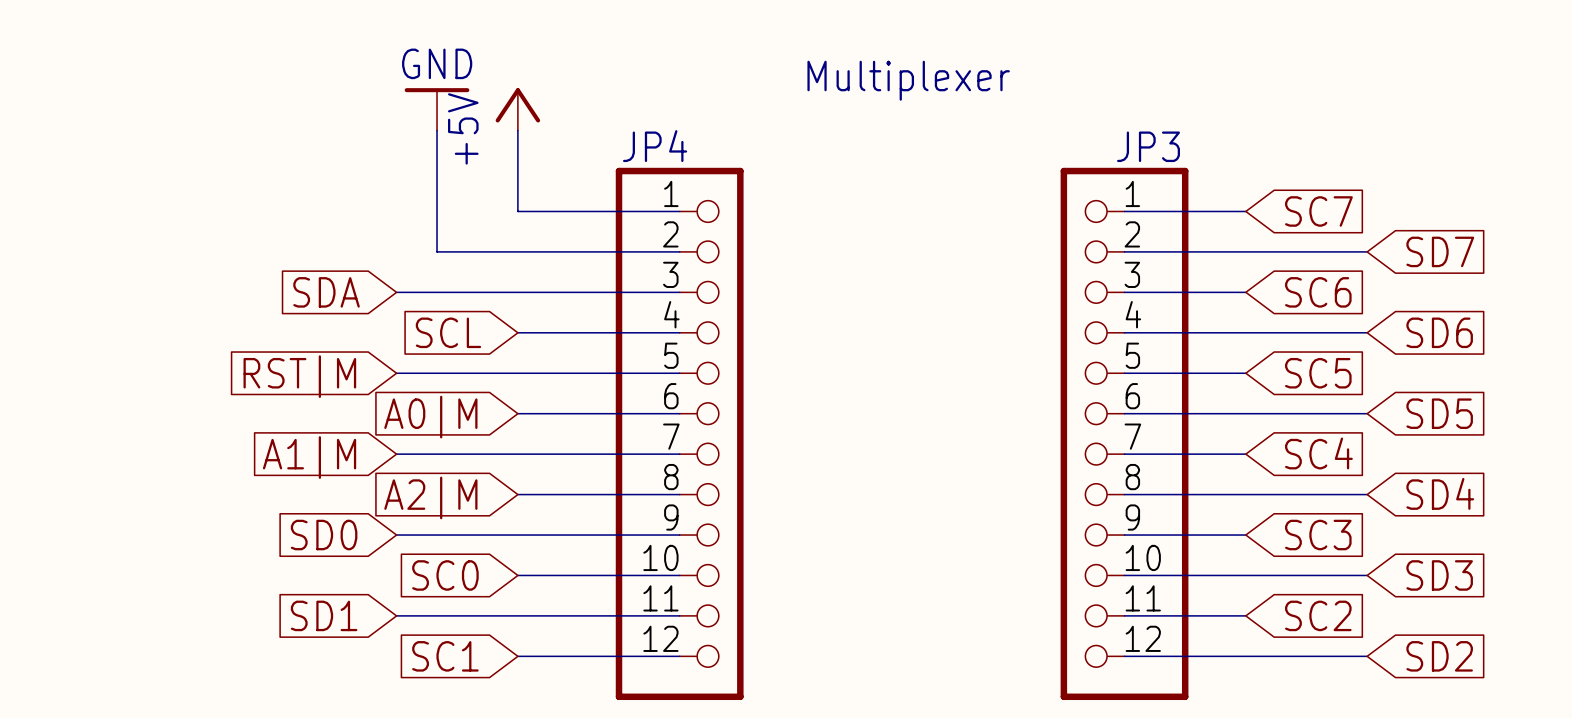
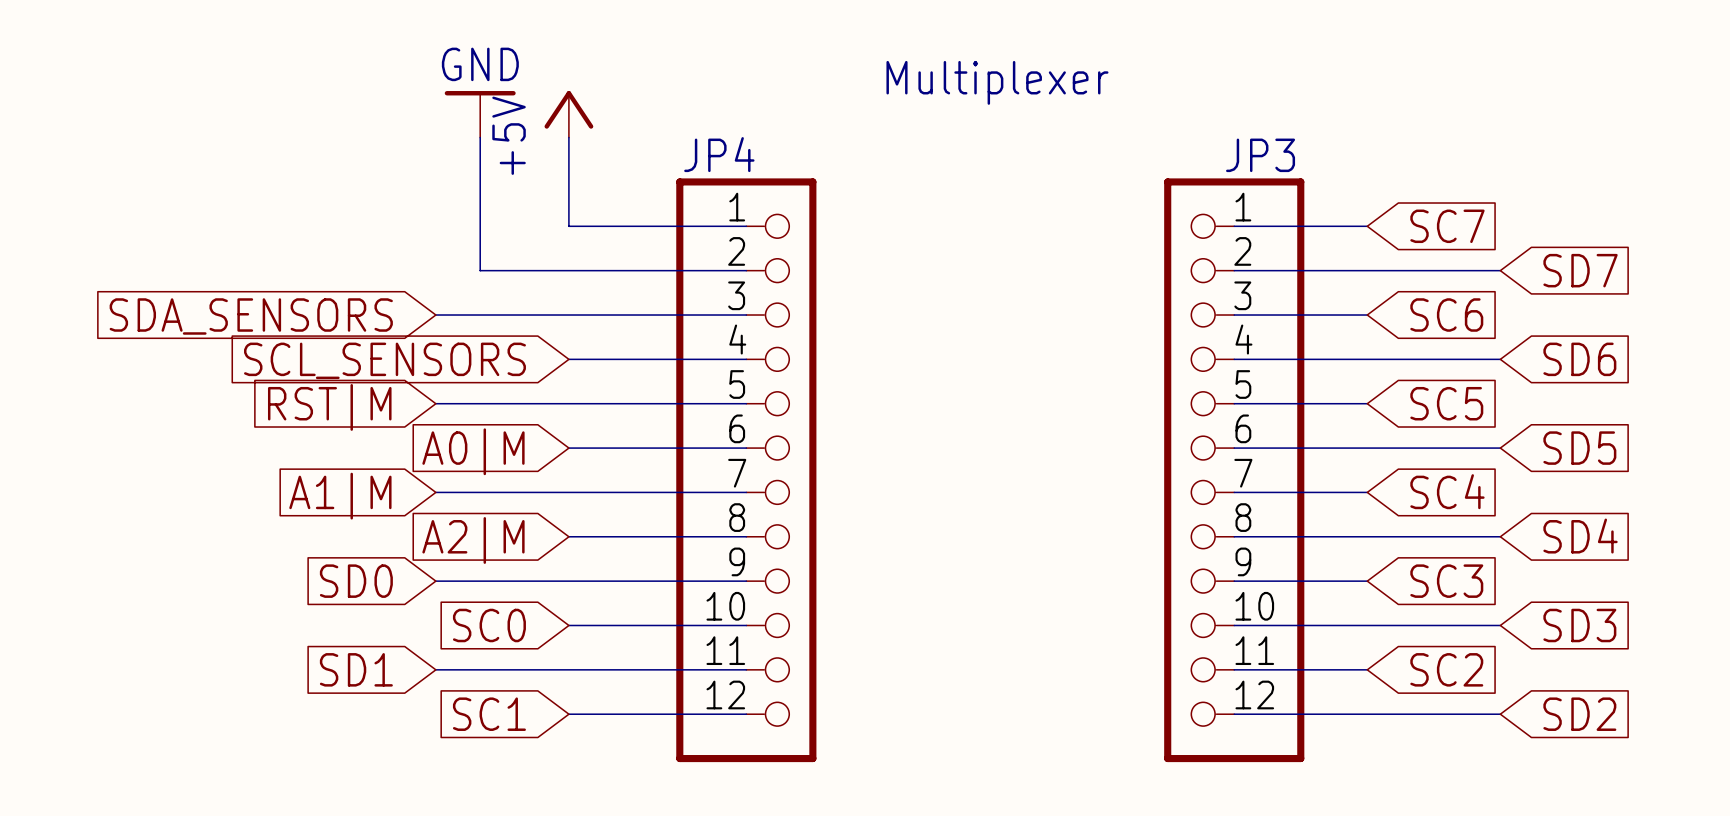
global label: SDA (326, 292) -> SDA_SENSORS (251, 316)
global label: SCL (448, 332) -> SCL_SENSORS (384, 360)

